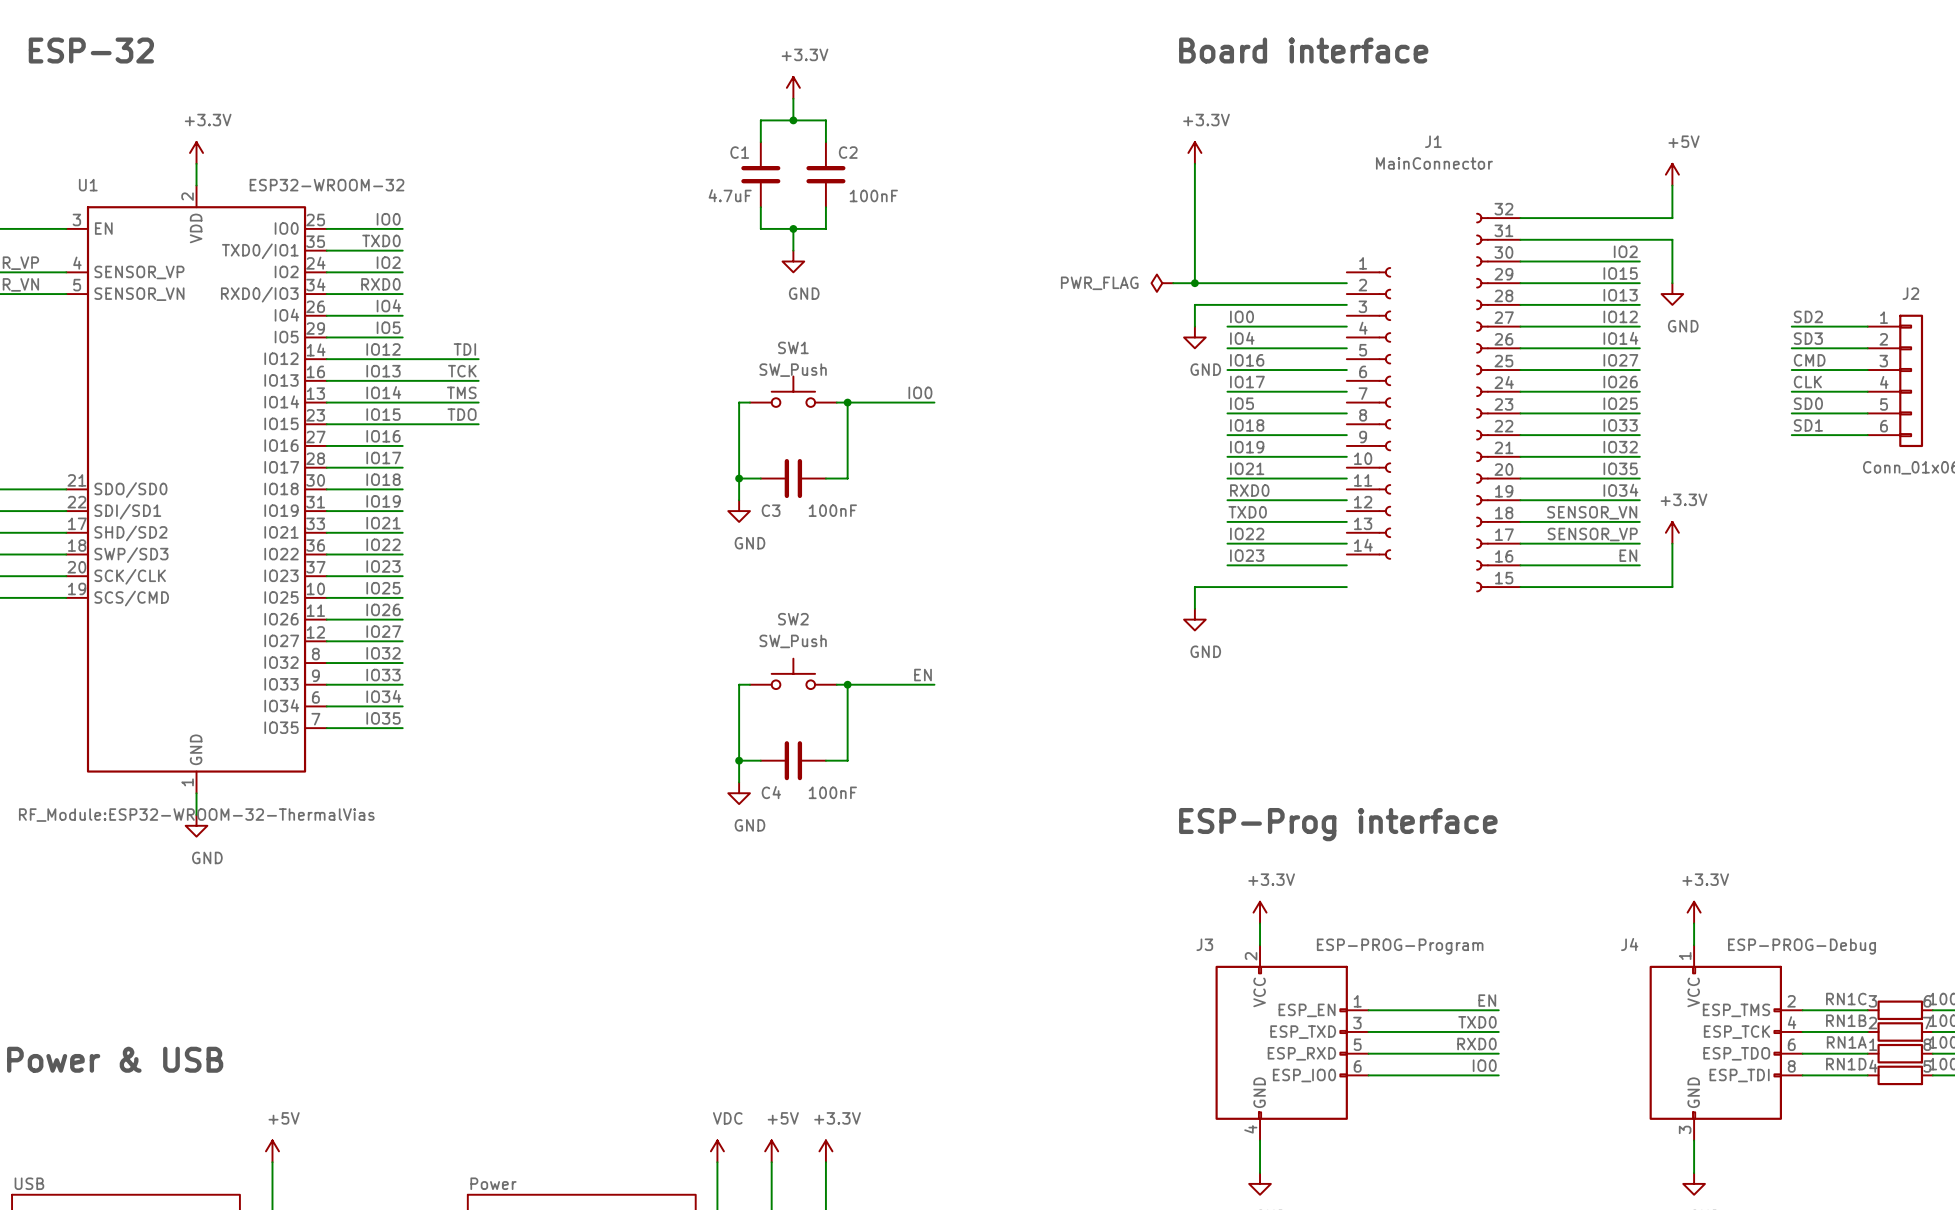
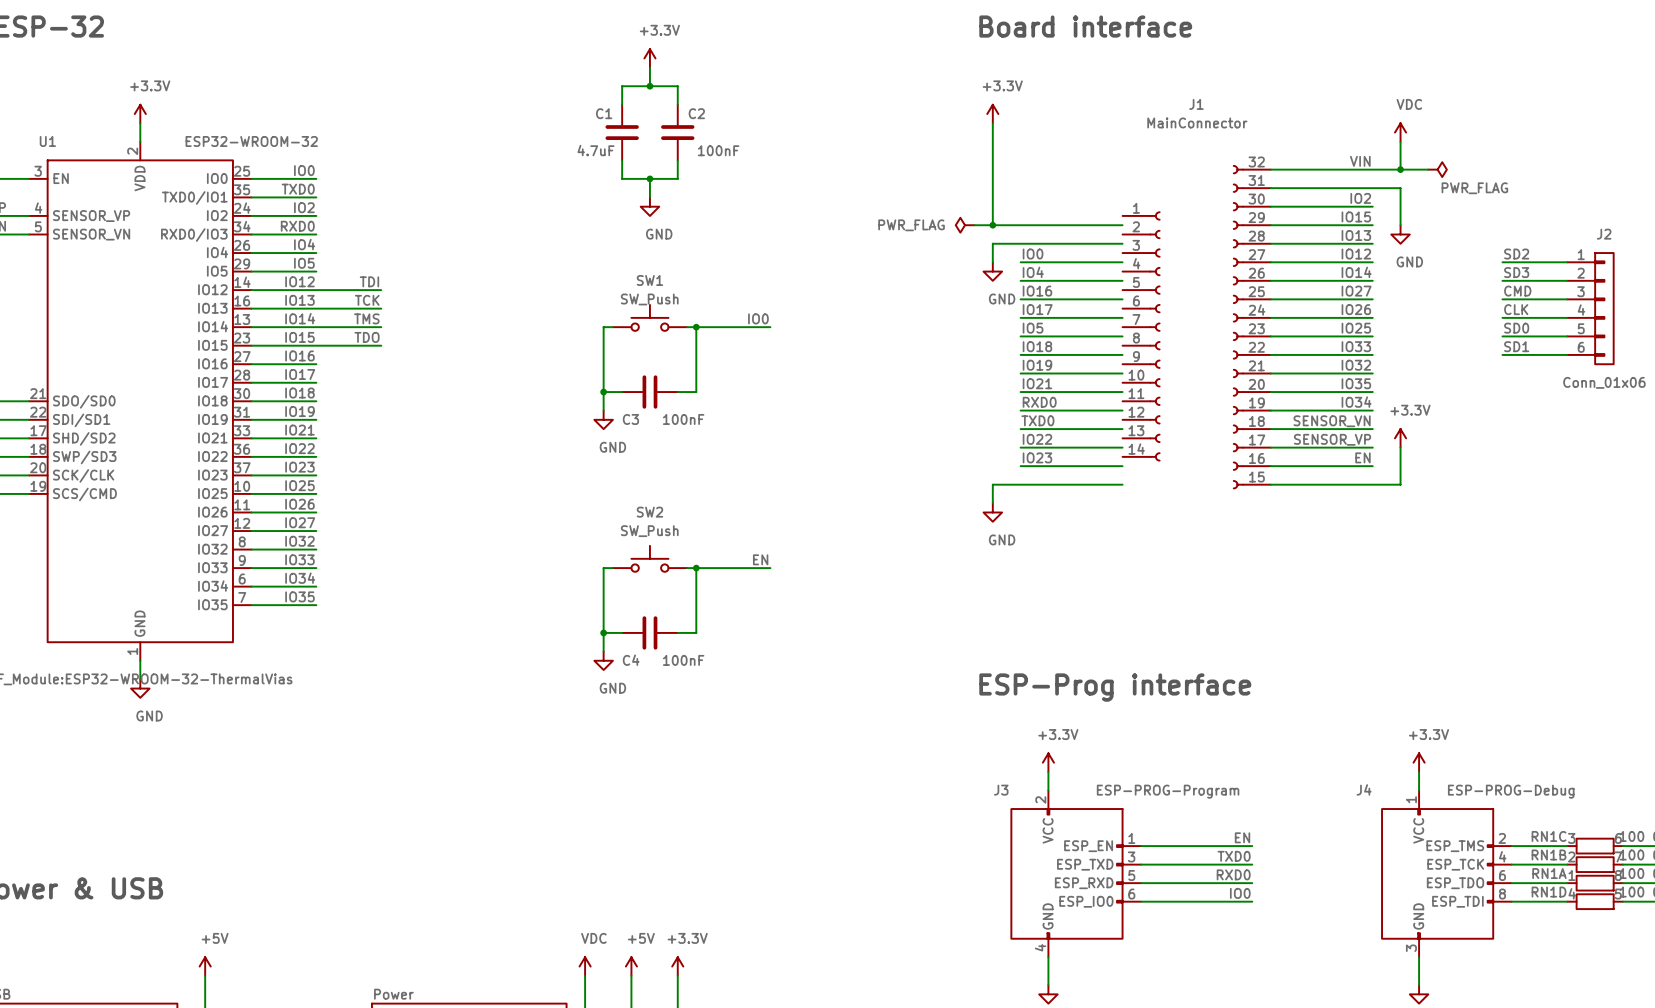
power symbol: +5V (1672, 174) -> VDC (1400, 132)
label: none -> VIN (1360, 161)
wire: none -> (1400, 169) (1428, 169)
junction: none -> (1400, 169)
power symbol: none -> PWR_FLAG (1437, 169)

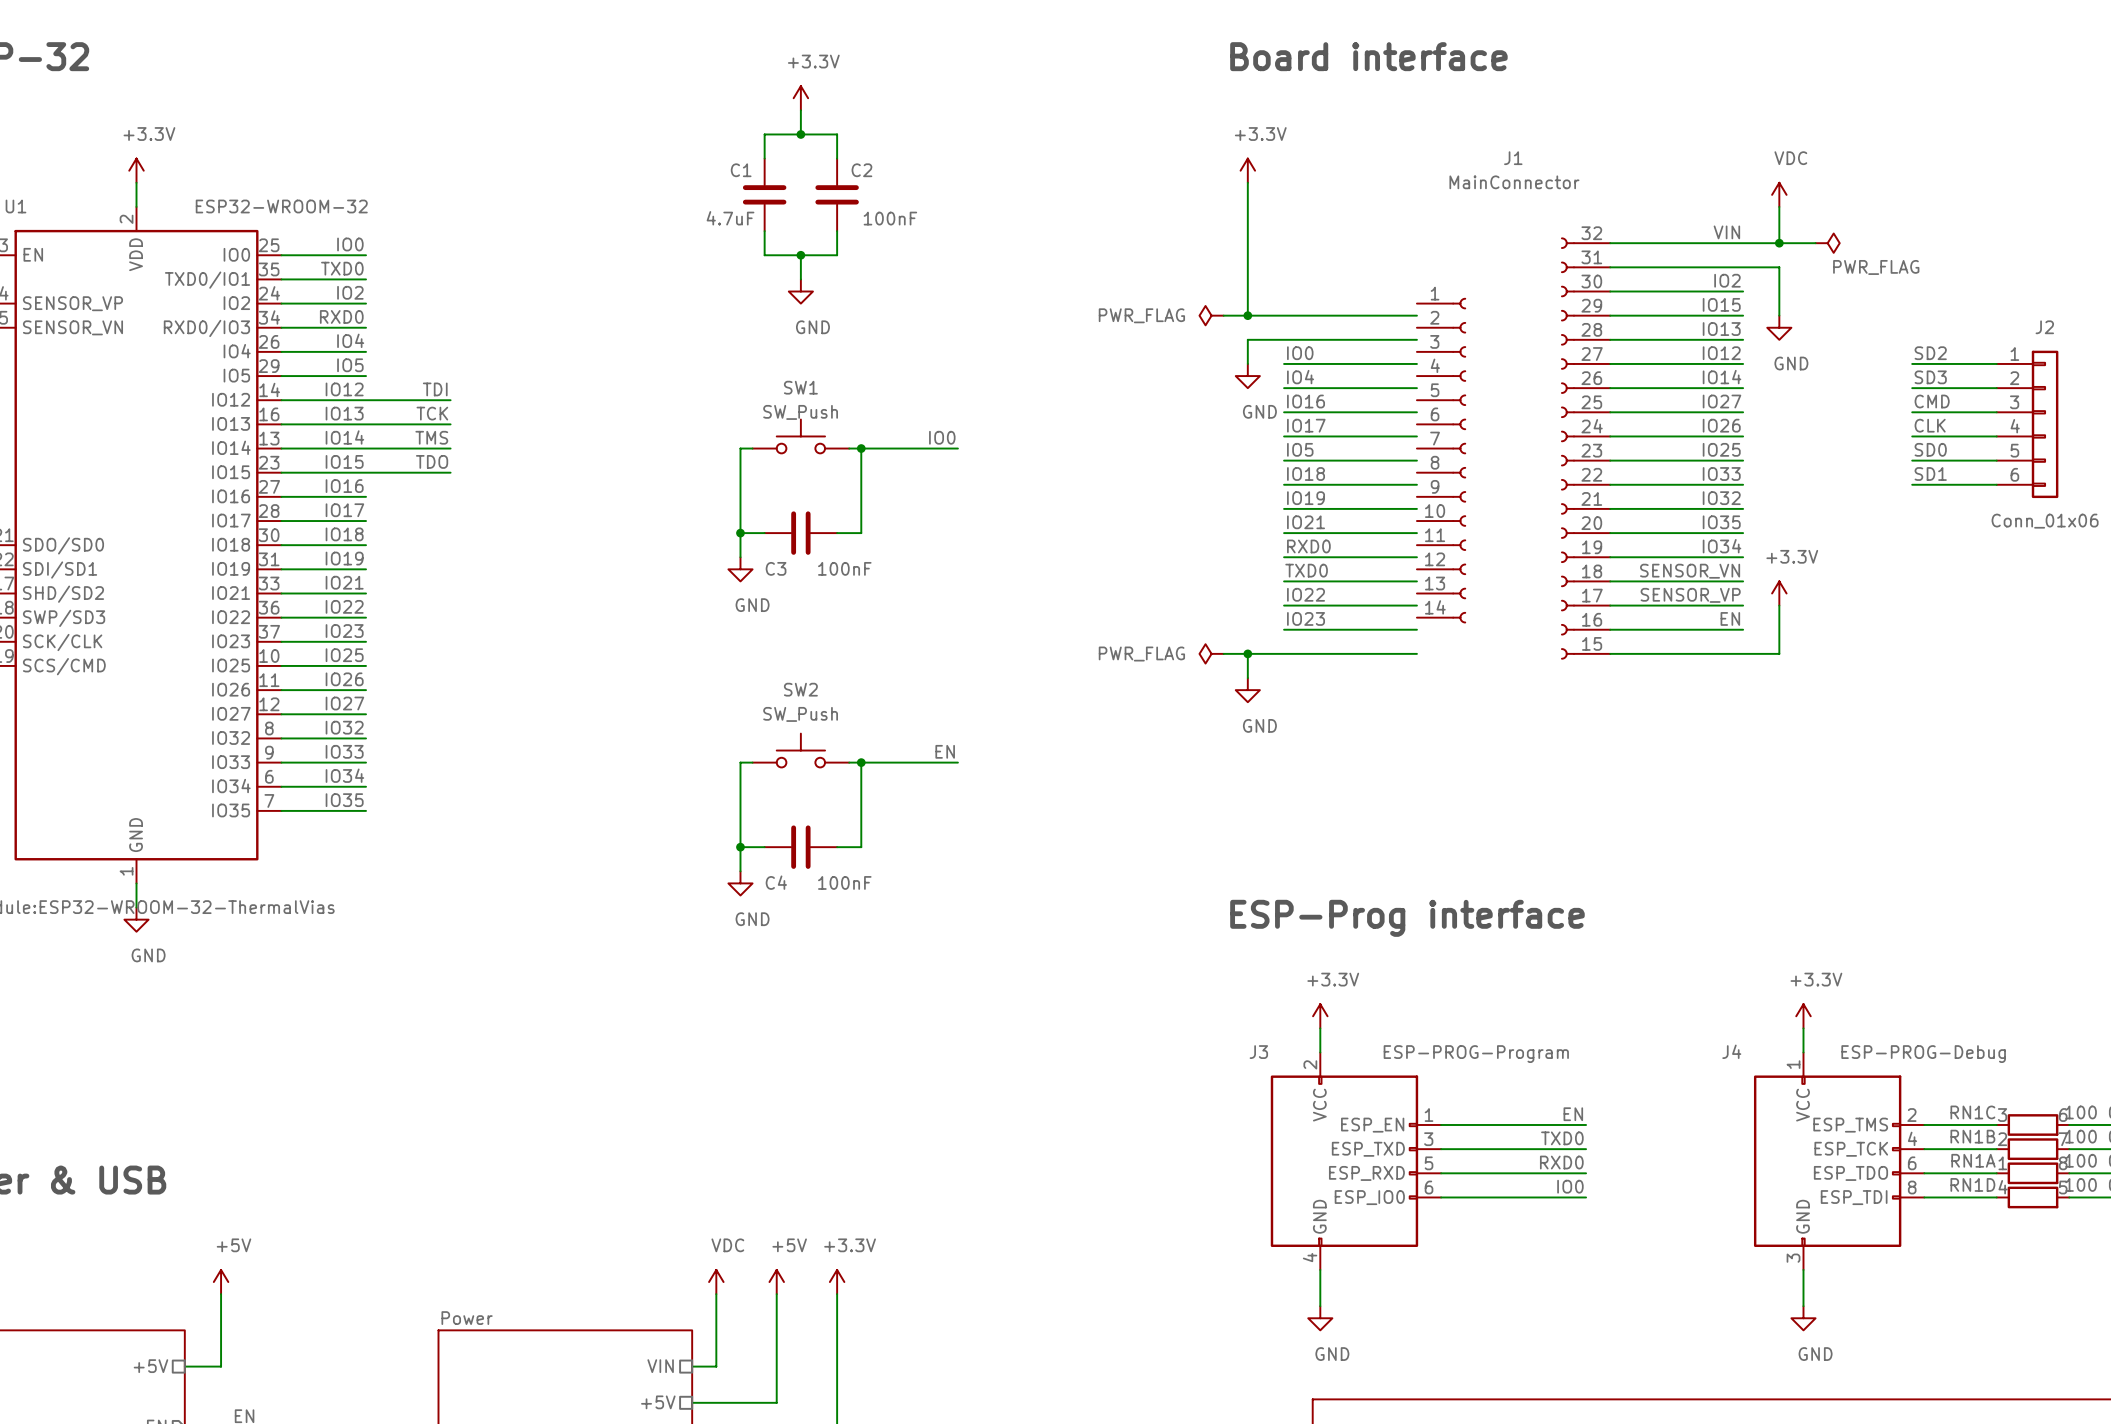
power symbol: none -> PWR_FLAG (1211, 653)
wire: none -> (1223, 653) (1247, 653)
junction: none -> (1247, 653)

